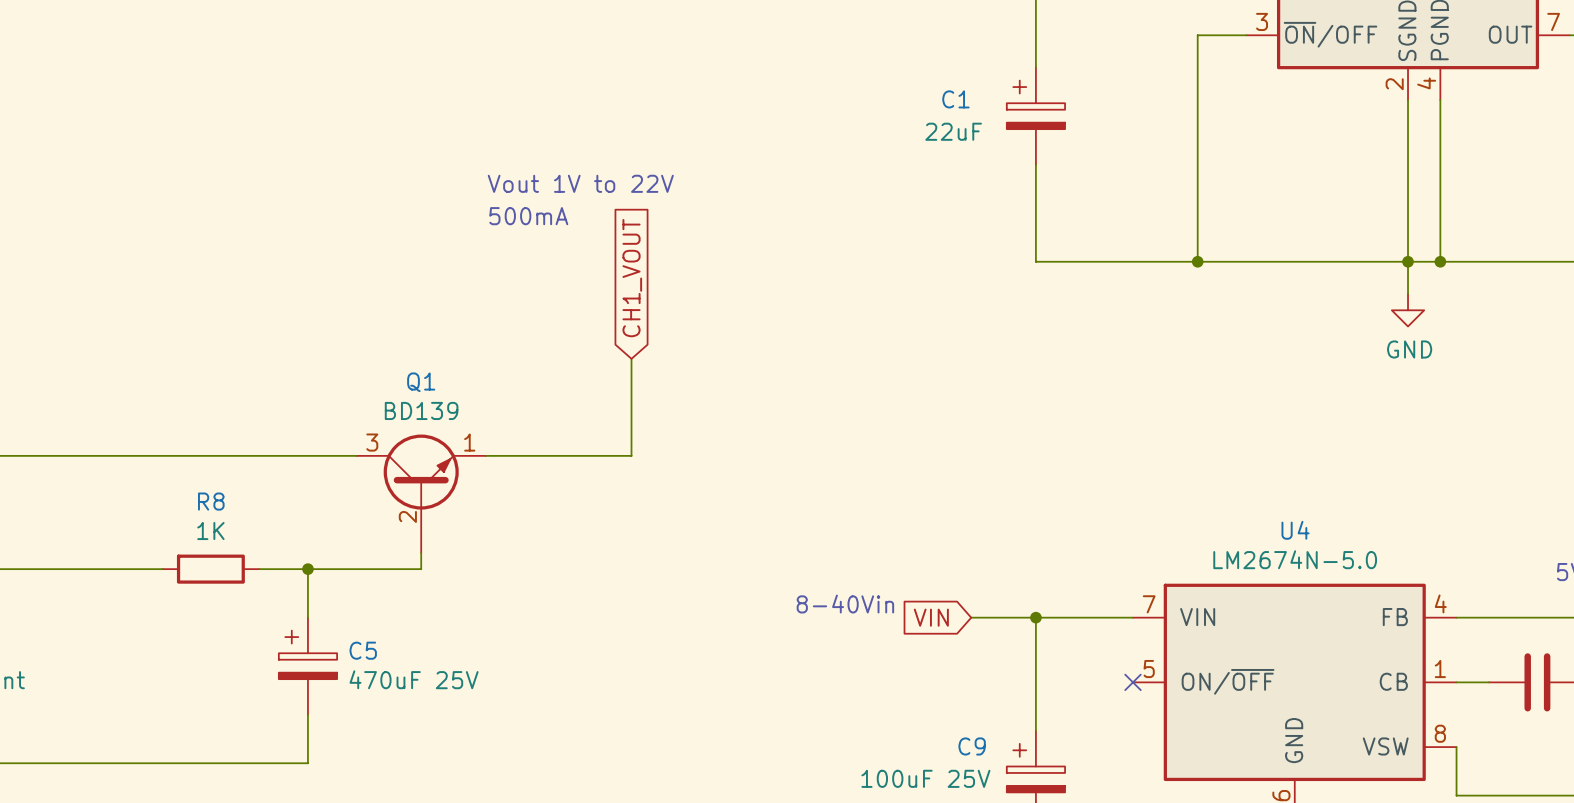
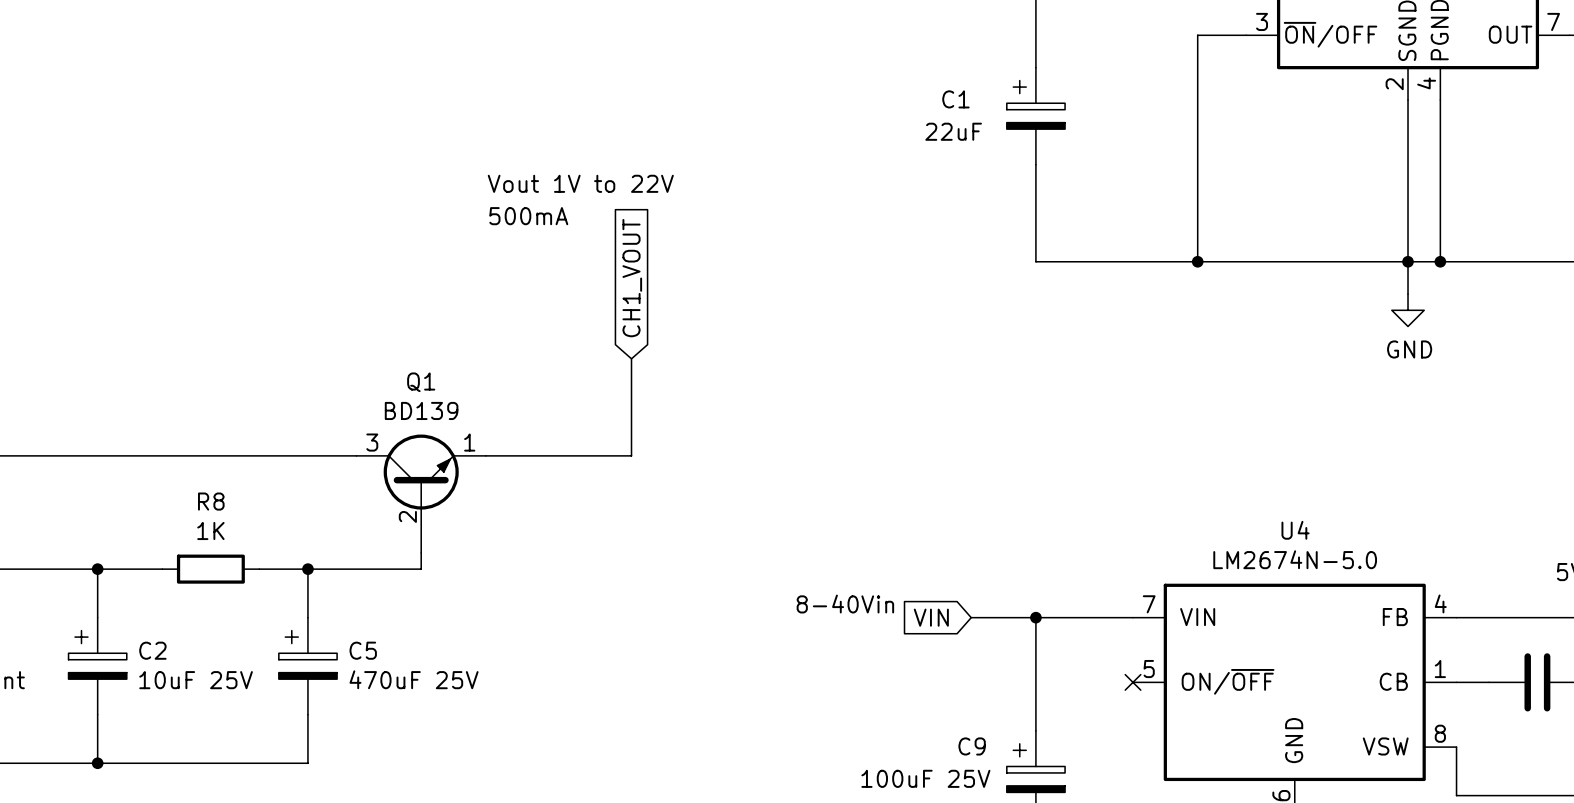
wire: none -> (97, 569) (97, 617)
junction: none -> (97, 569)
C2: none -> 10uF 25V (97, 666)
wire: none -> (97, 714) (97, 763)
junction: none -> (97, 763)

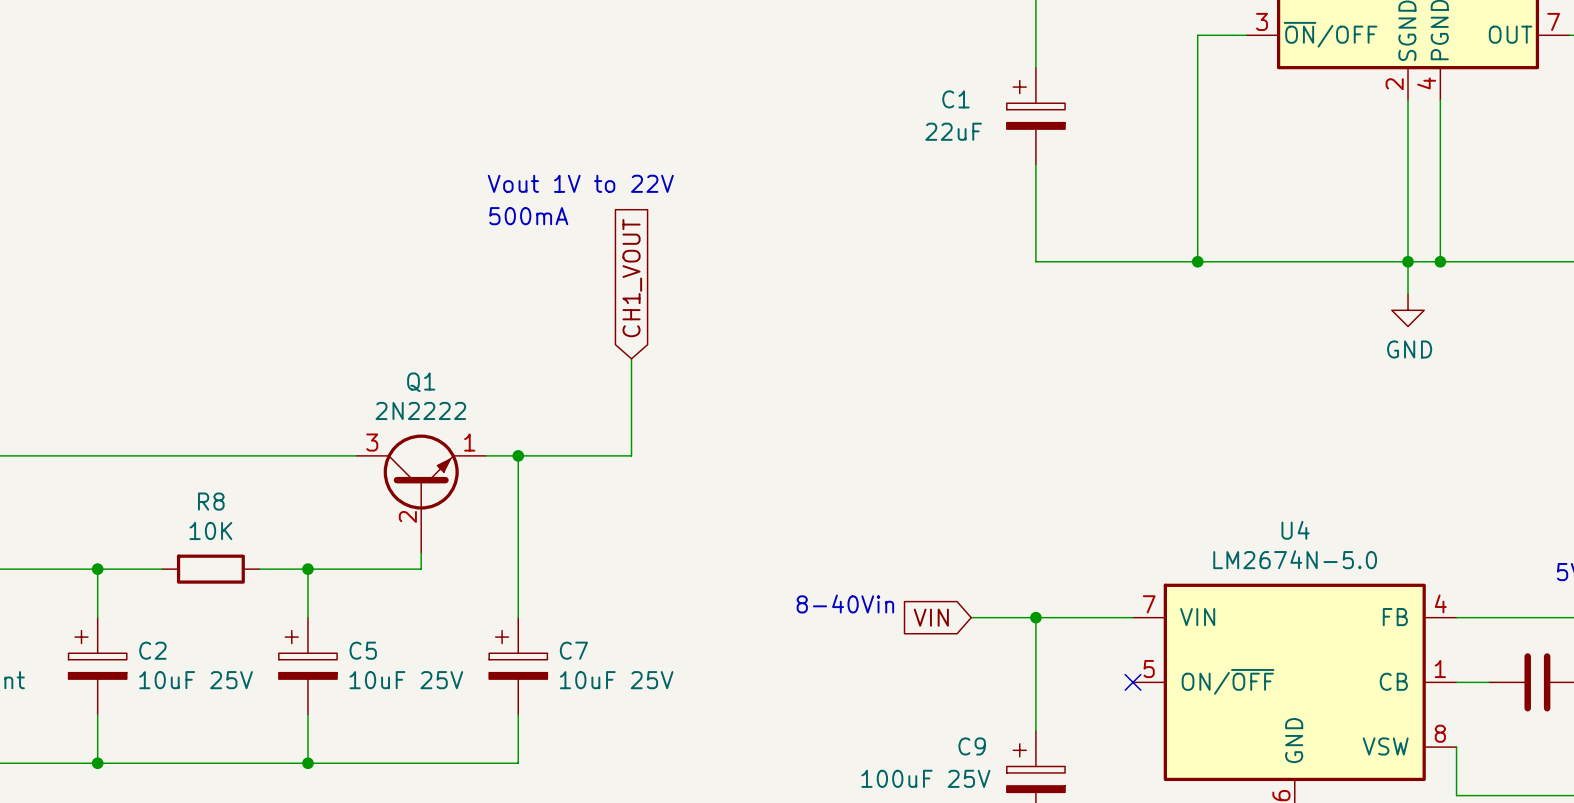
Q1 value: BD139 (421, 410) -> 2N2222 (420, 410)
wire: none -> (518, 455) (518, 617)
junction: none -> (518, 455)
R8 value: 1K (210, 530) -> 10K (210, 530)
C7: none -> 10uF 25V (518, 666)
C5 value: 470uF 25V (414, 679) -> 10uF 25V (406, 680)
wire: none -> (518, 714) (518, 763) (307, 763)
junction: none -> (307, 763)

